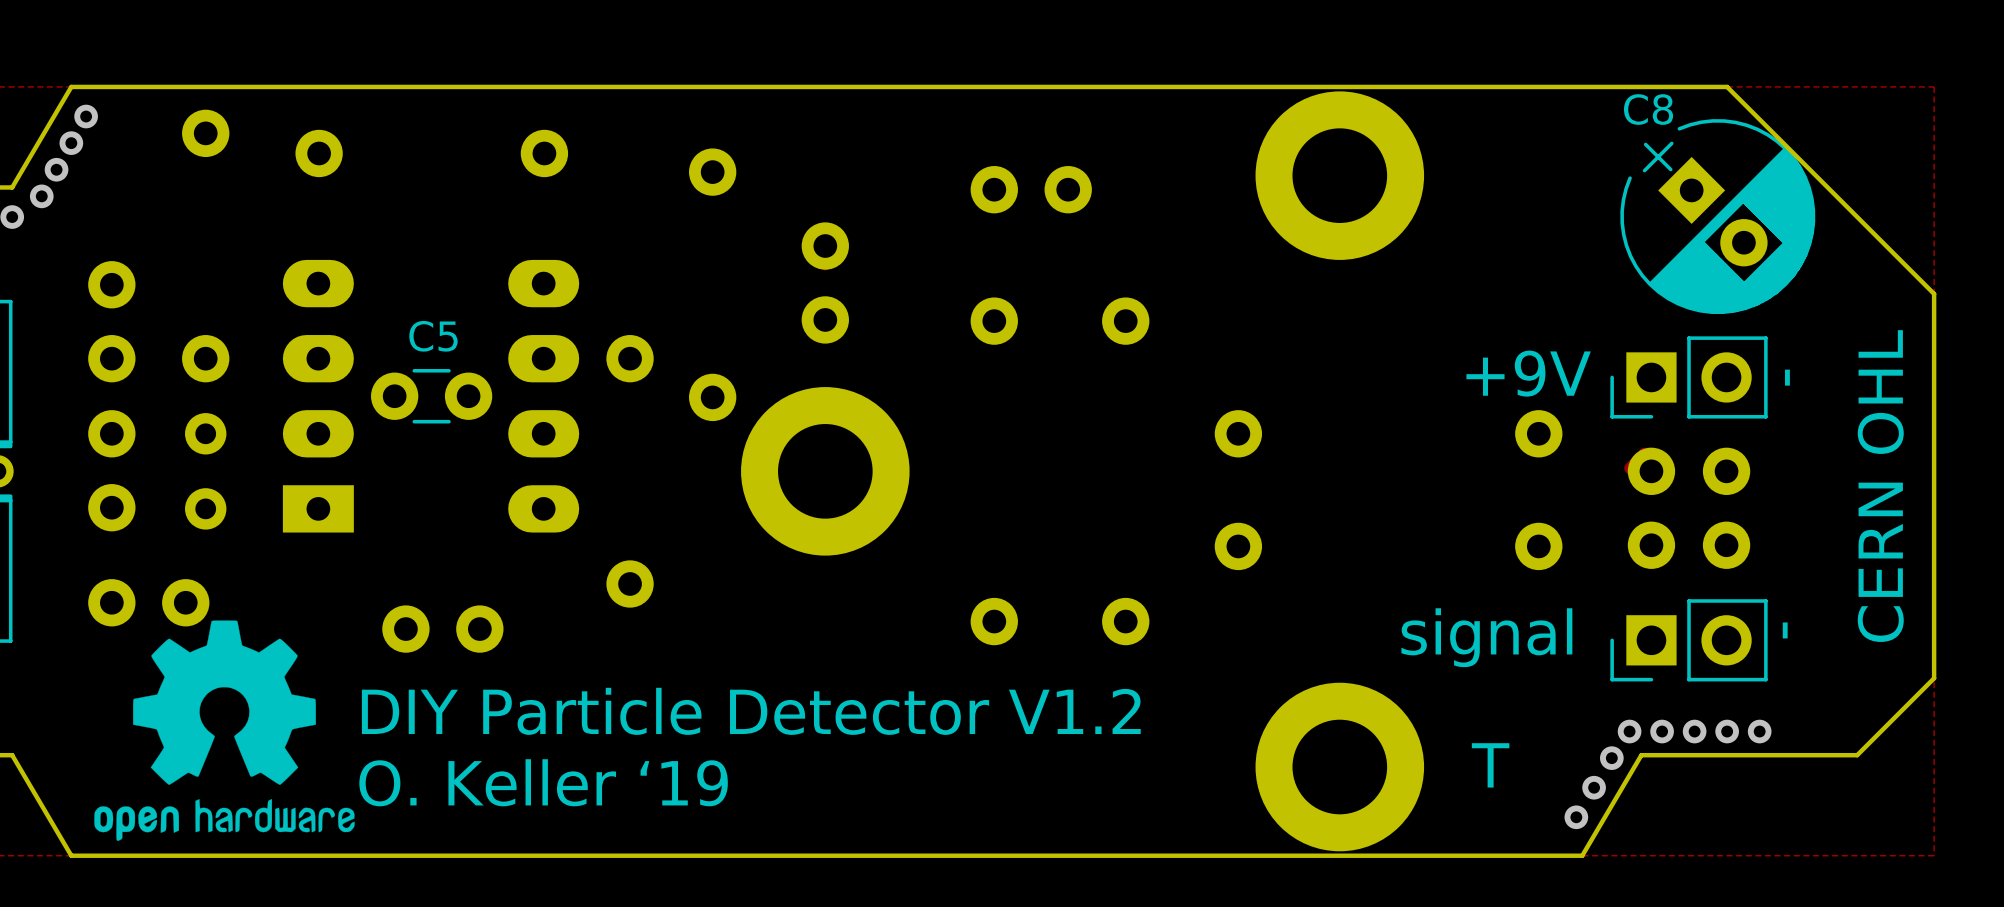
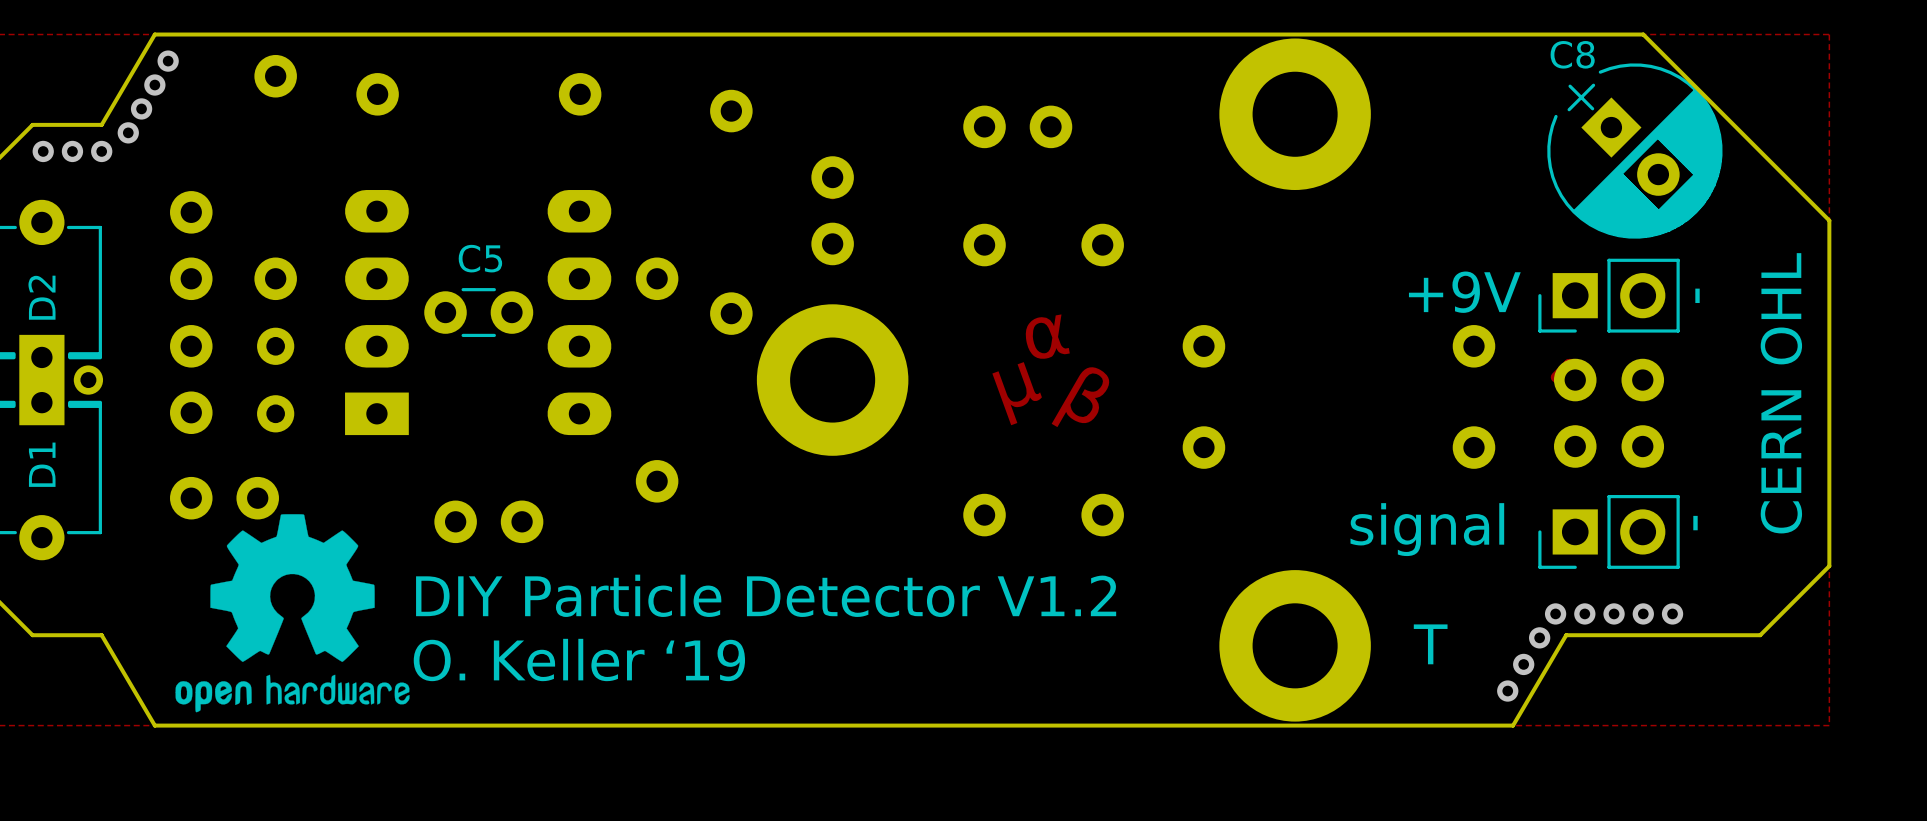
text: none -> α (1047, 337)
text: none -> μ (1017, 393)
text: none -> β (1082, 395)

